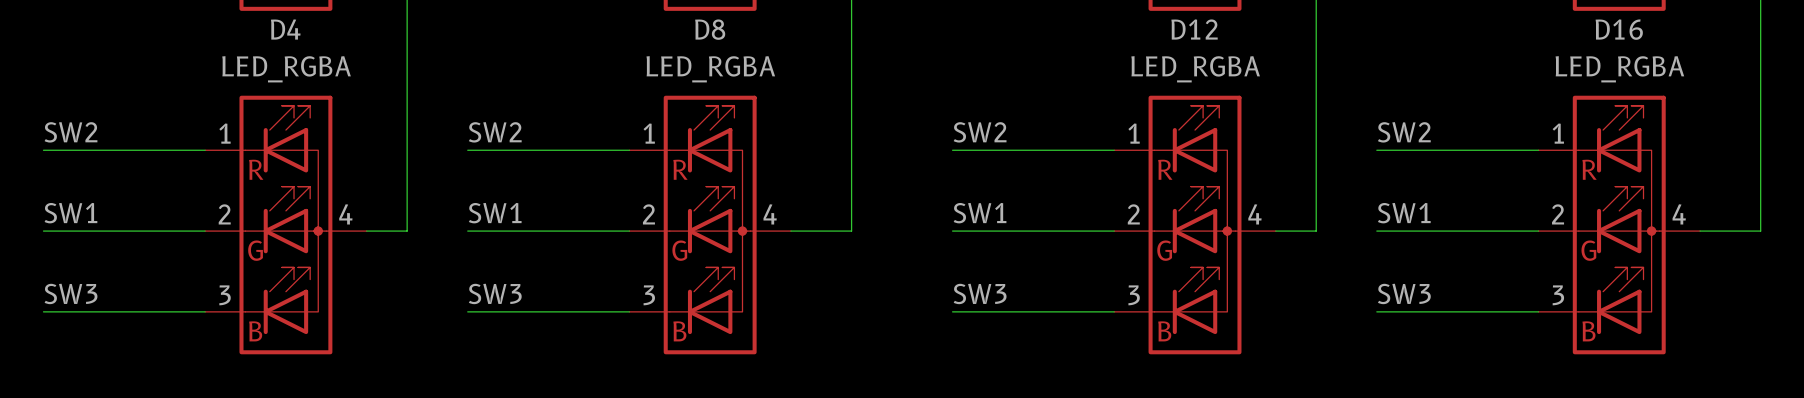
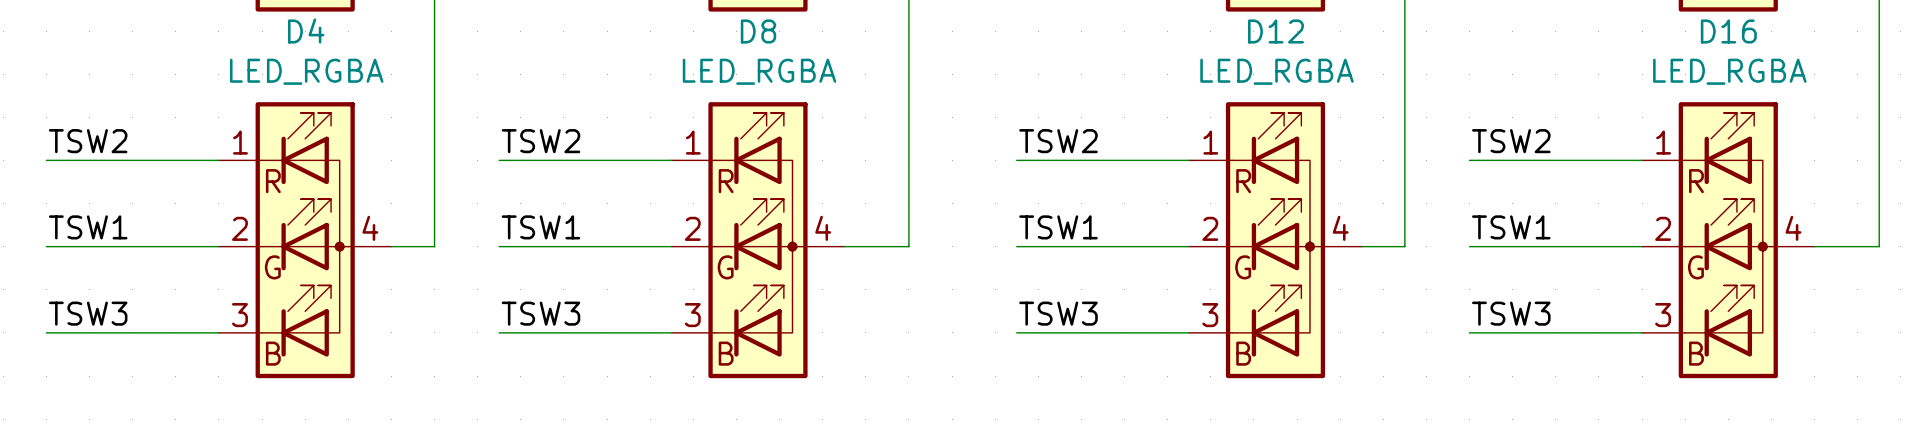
label: SW2 (71, 132) -> TSW2 (88, 141)
label: SW2 (495, 132) -> TSW2 (540, 141)
label: SW2 (980, 132) -> TSW2 (1058, 141)
label: SW2 (1404, 132) -> TSW2 (1511, 141)
label: SW1 (70, 213) -> TSW1 (88, 227)
label: SW1 (495, 213) -> TSW1 (540, 227)
label: SW1 (980, 213) -> TSW1 (1058, 227)
label: SW1 (1404, 213) -> TSW1 (1511, 227)
label: SW3 (71, 293) -> TSW3 (88, 313)
label: SW3 (495, 293) -> TSW3 (540, 313)
label: SW3 (980, 293) -> TSW3 (1058, 313)
label: SW3 (1404, 293) -> TSW3 (1511, 313)

